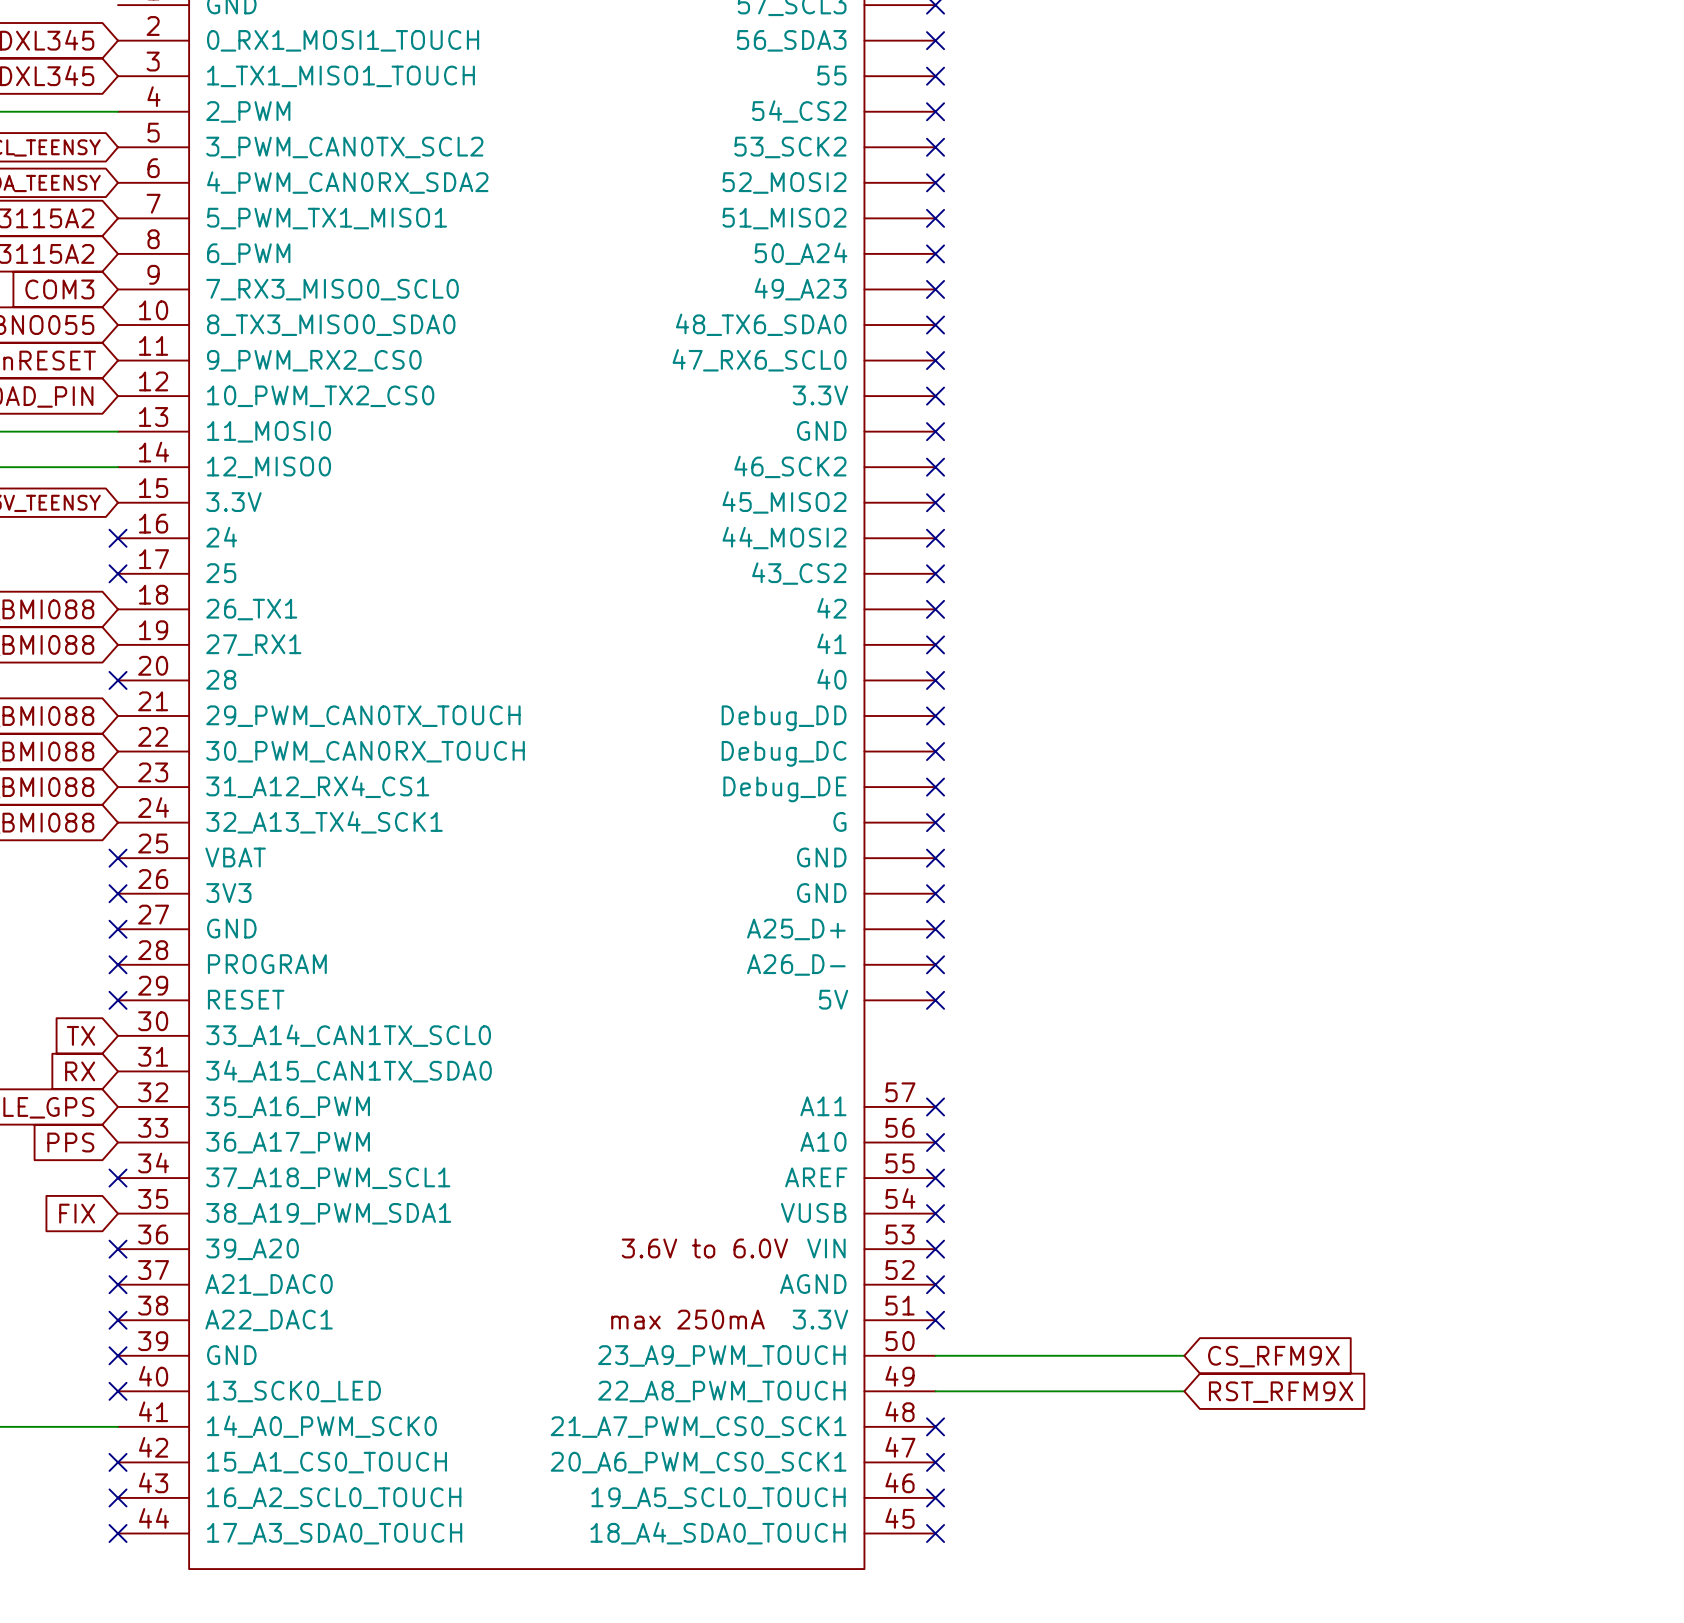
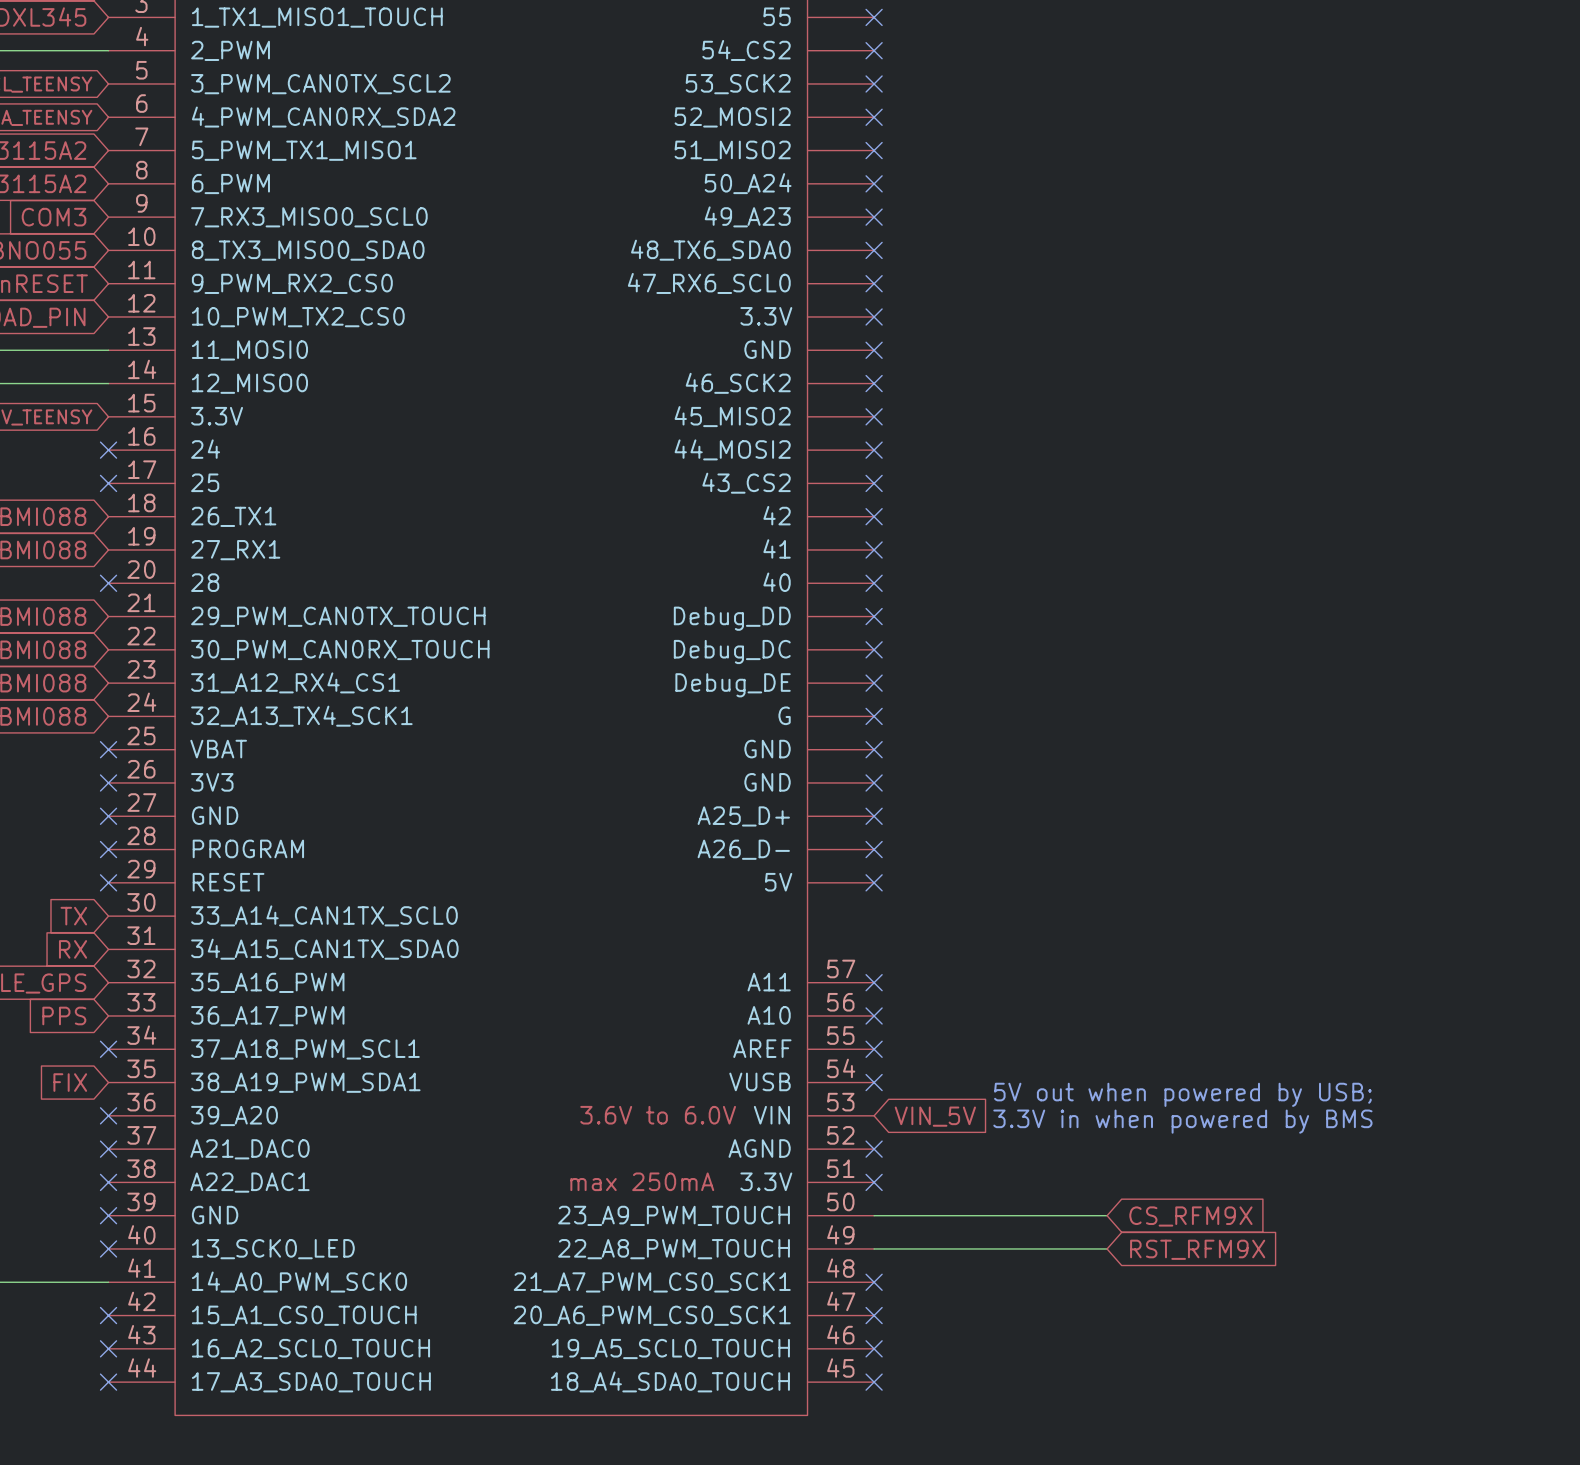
text: none -> 5V out when powered by USB; (1182, 1094)
no-connect mark: (935, 1249) -> none
global label: none -> VIN_5V (935, 1116)
text: none -> 3.3V in when powered by BMS (1182, 1121)

